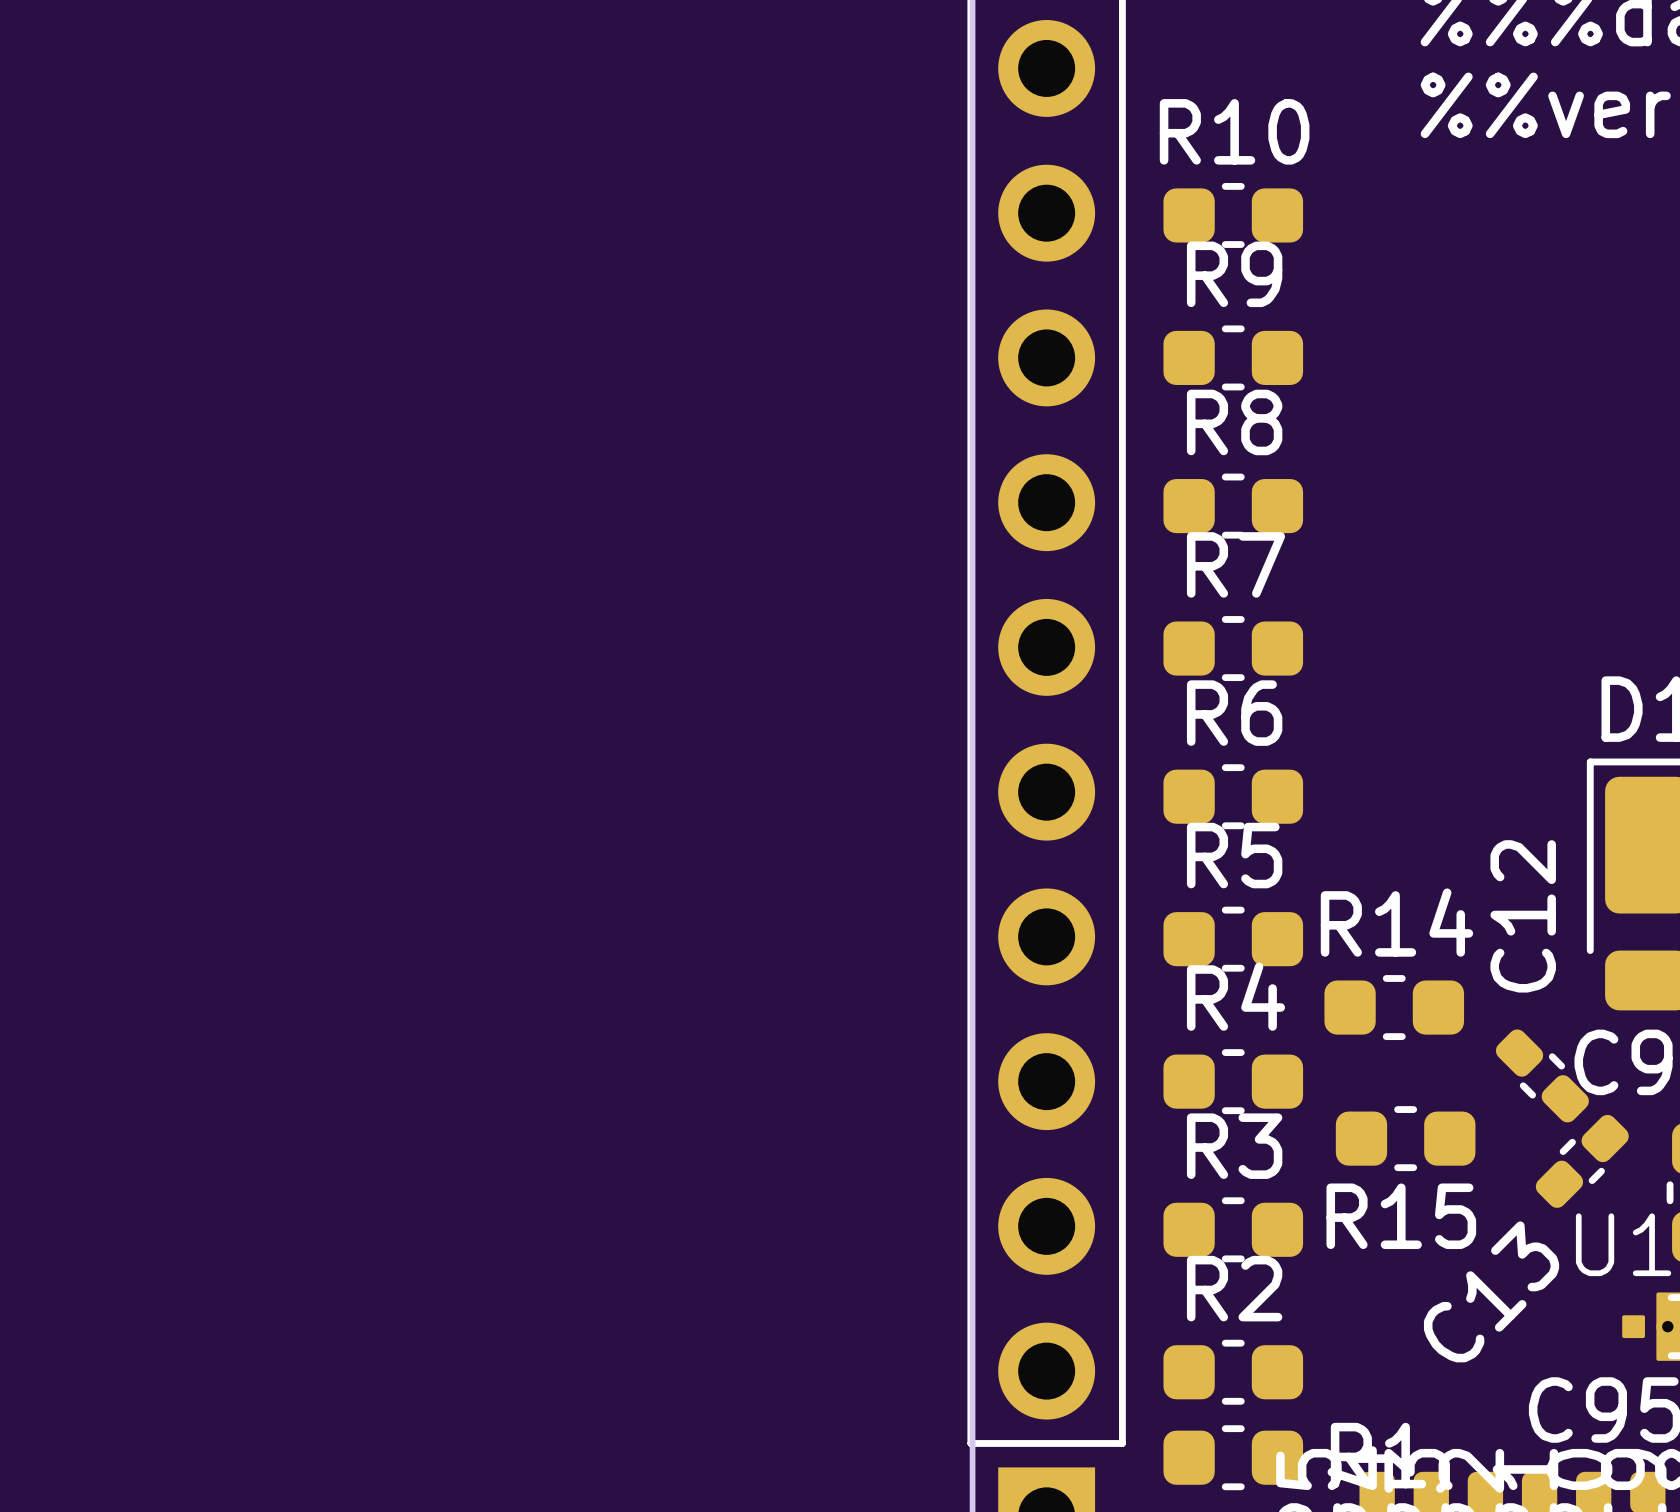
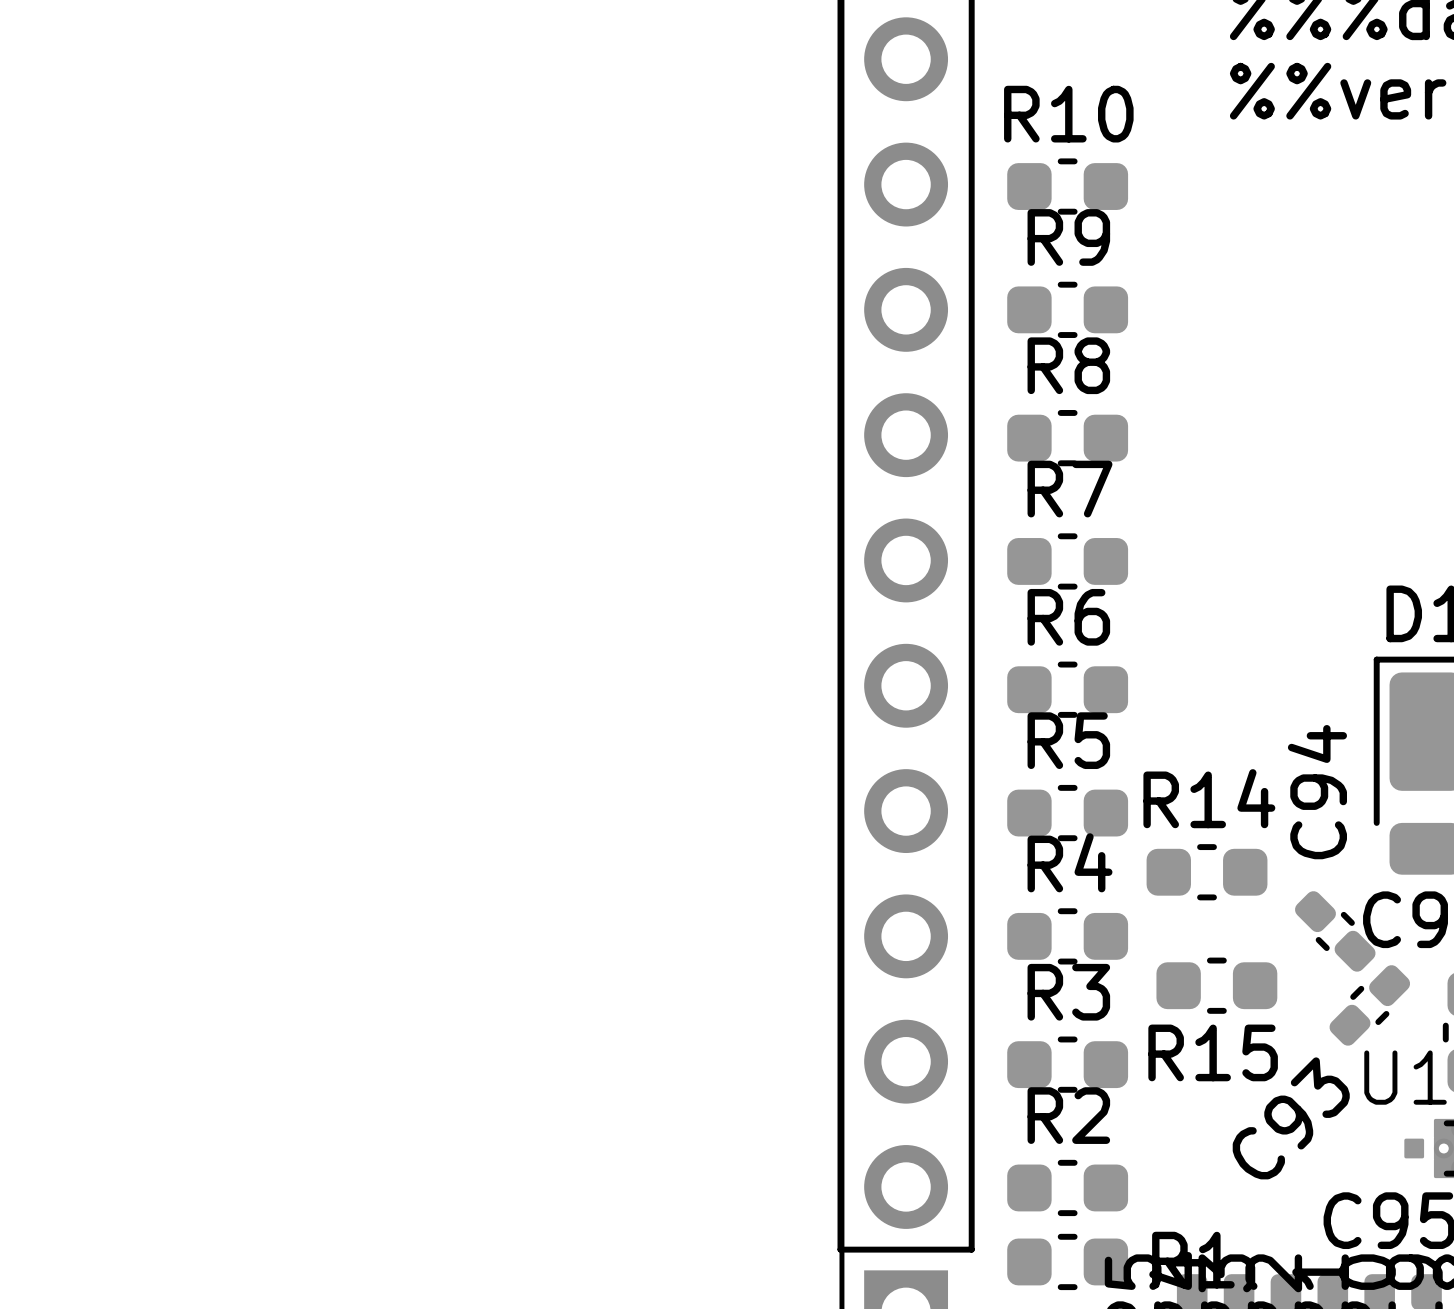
C12 name: C12 (1523, 916) -> C94 (1317, 792)
C13 name: C13 (1491, 1291) -> C93 (1291, 1118)

